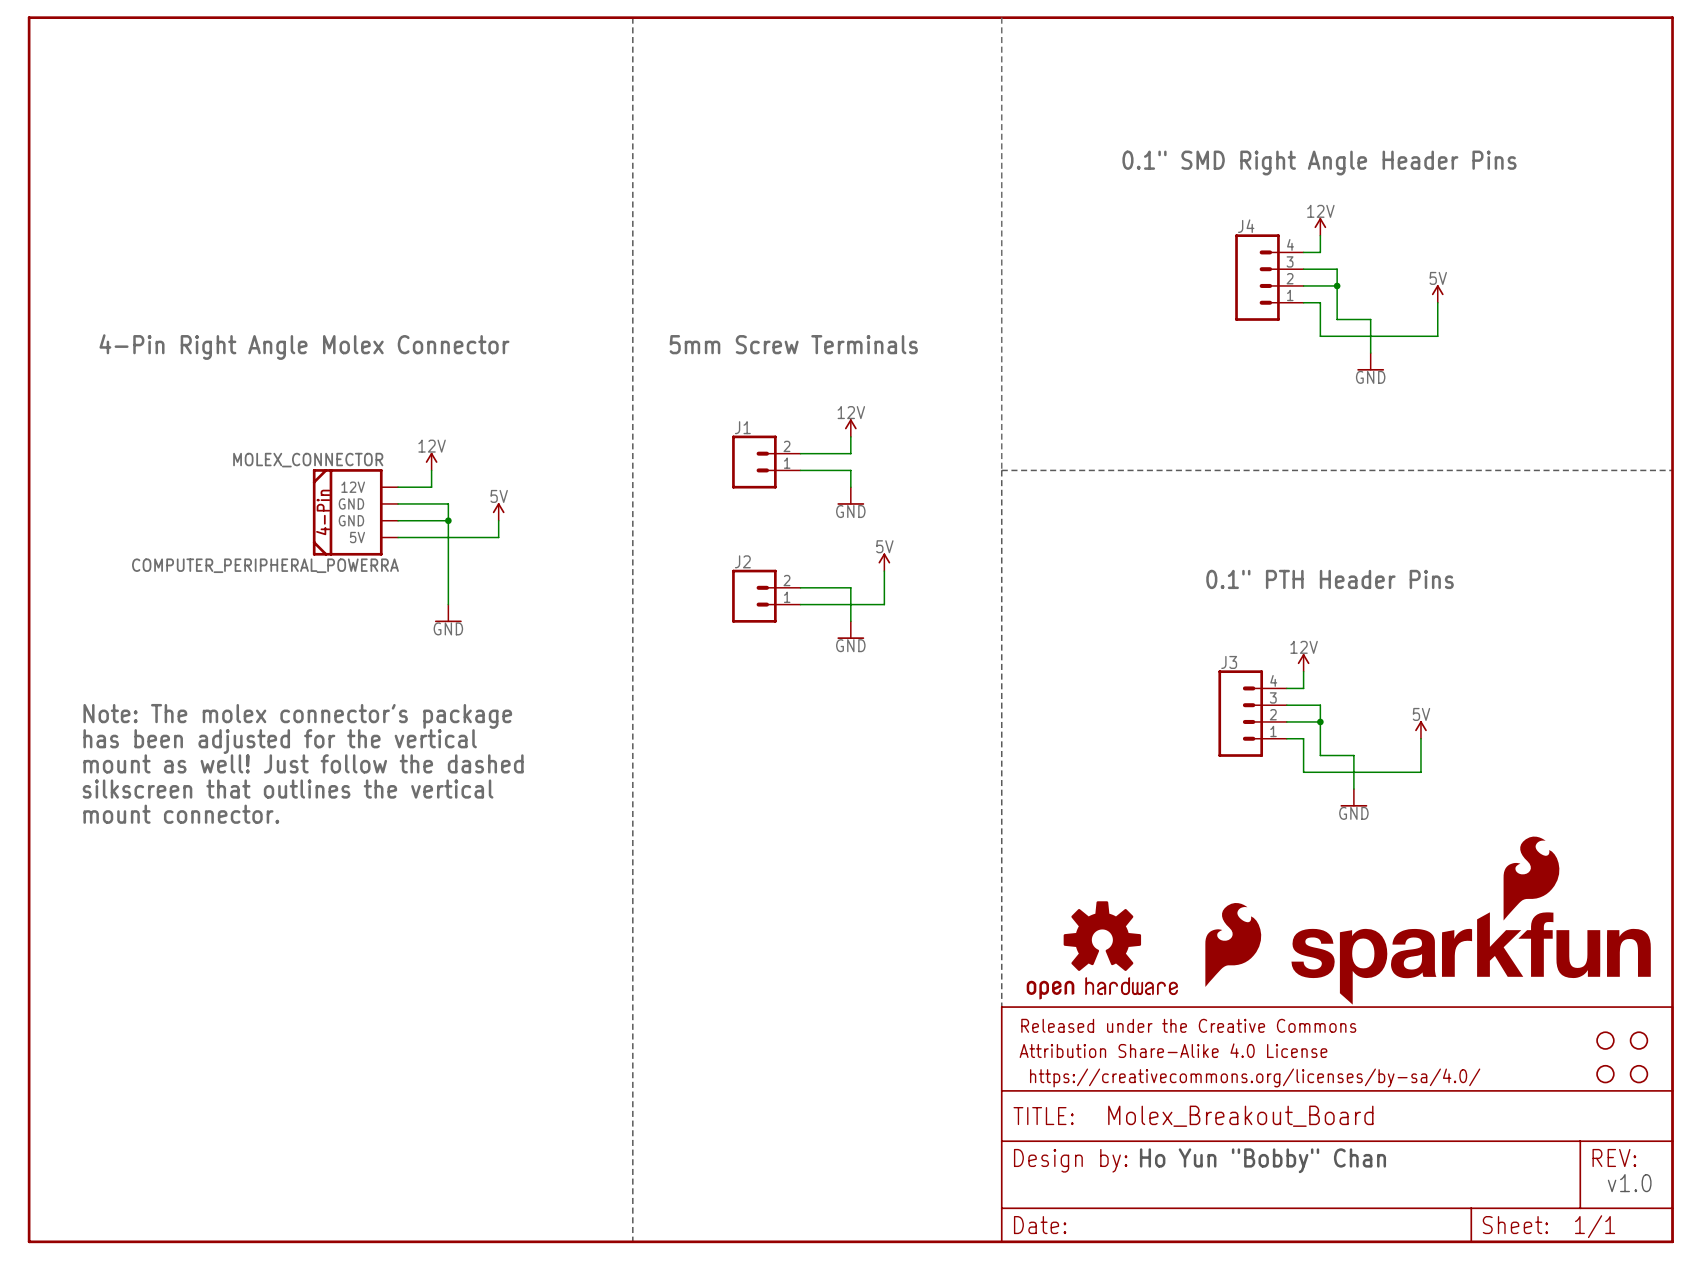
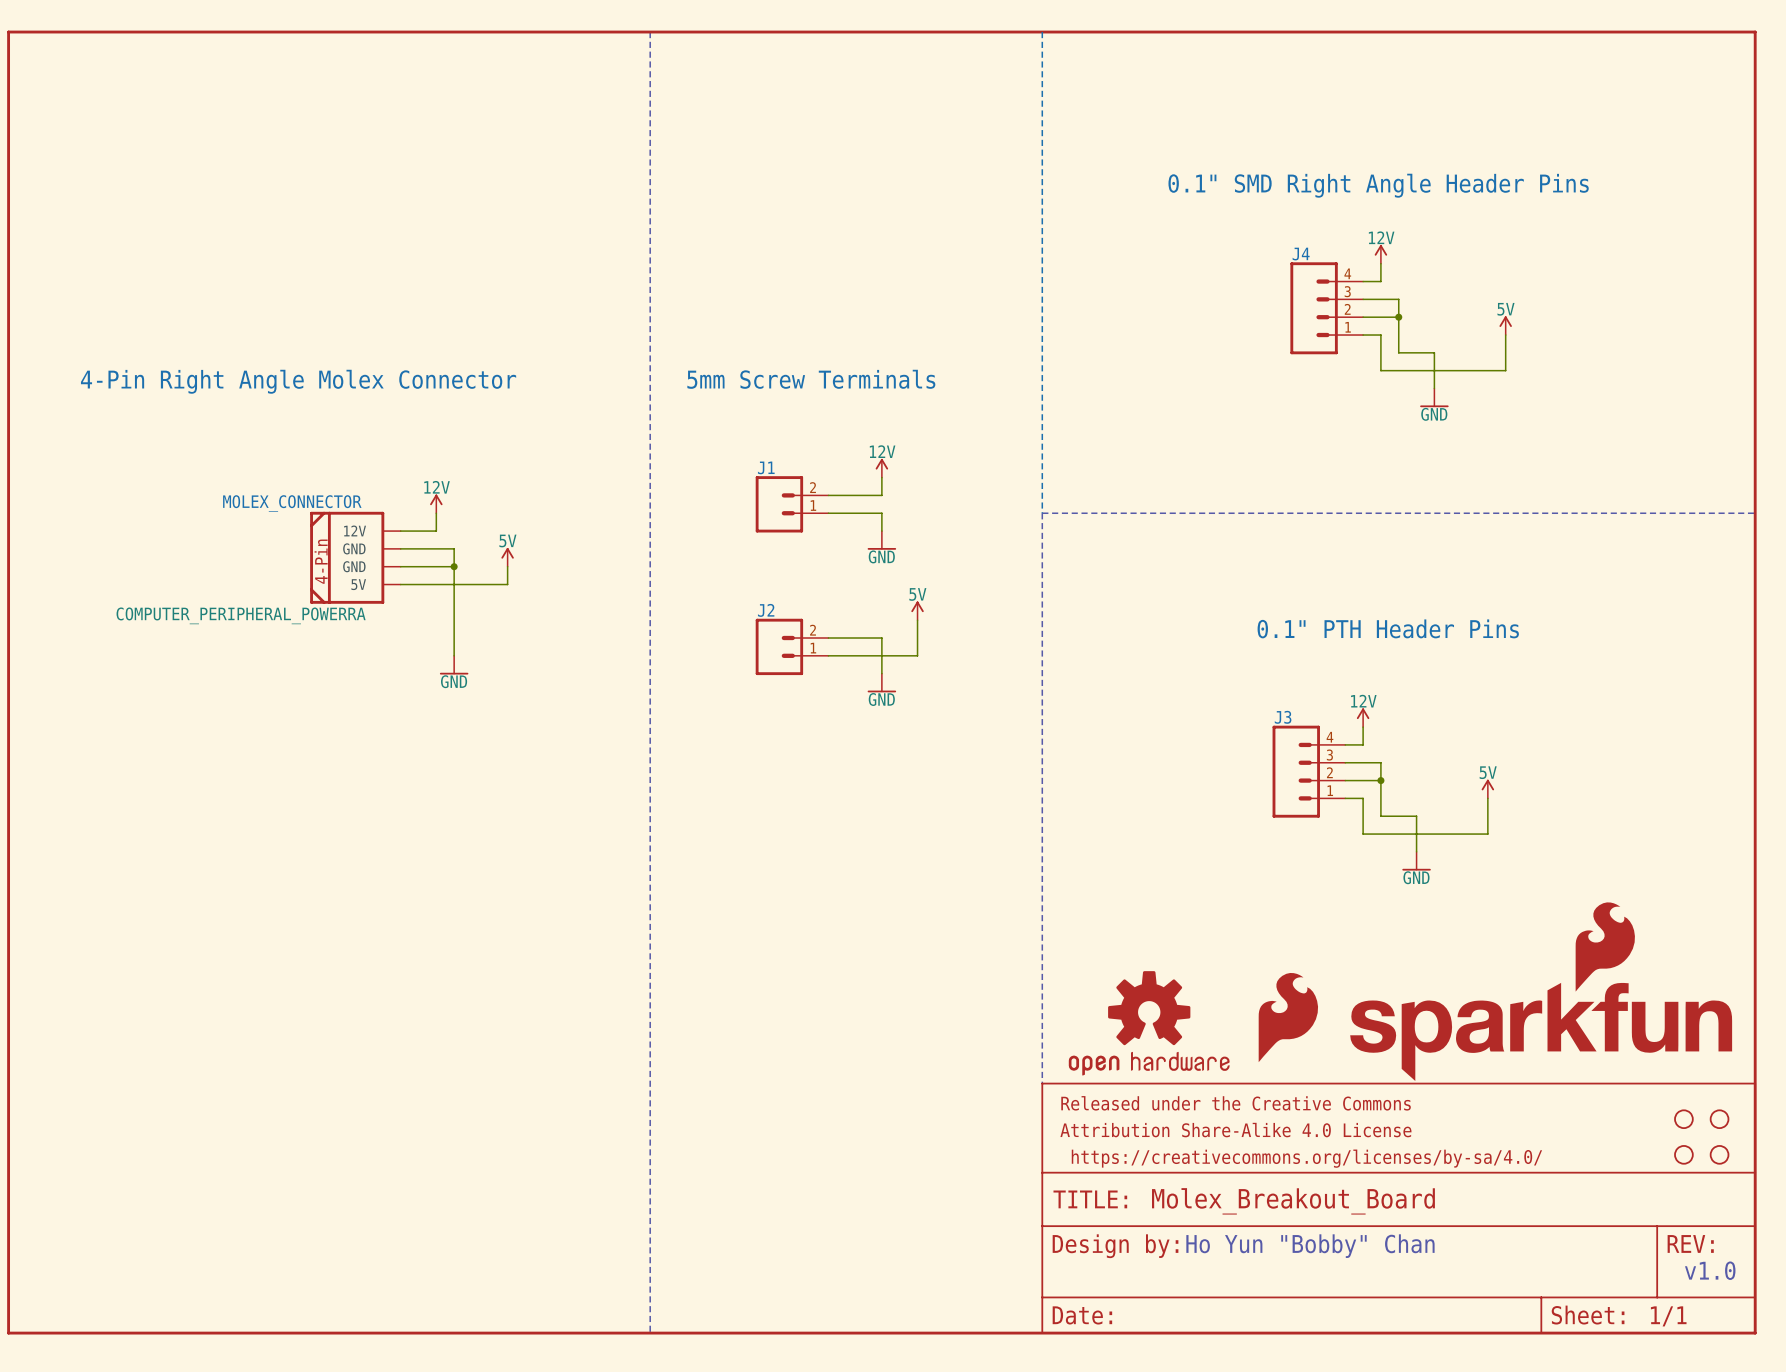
text: Note: The molex connector's package (297, 716) -> none
text: has been adjusted for the vertical (280, 741) -> none
text: mount as well! Just follow the dashed (303, 763) -> none
text: silkscreen that outlines the vertical (288, 789) -> none
text: mount connector. (181, 814) -> none

